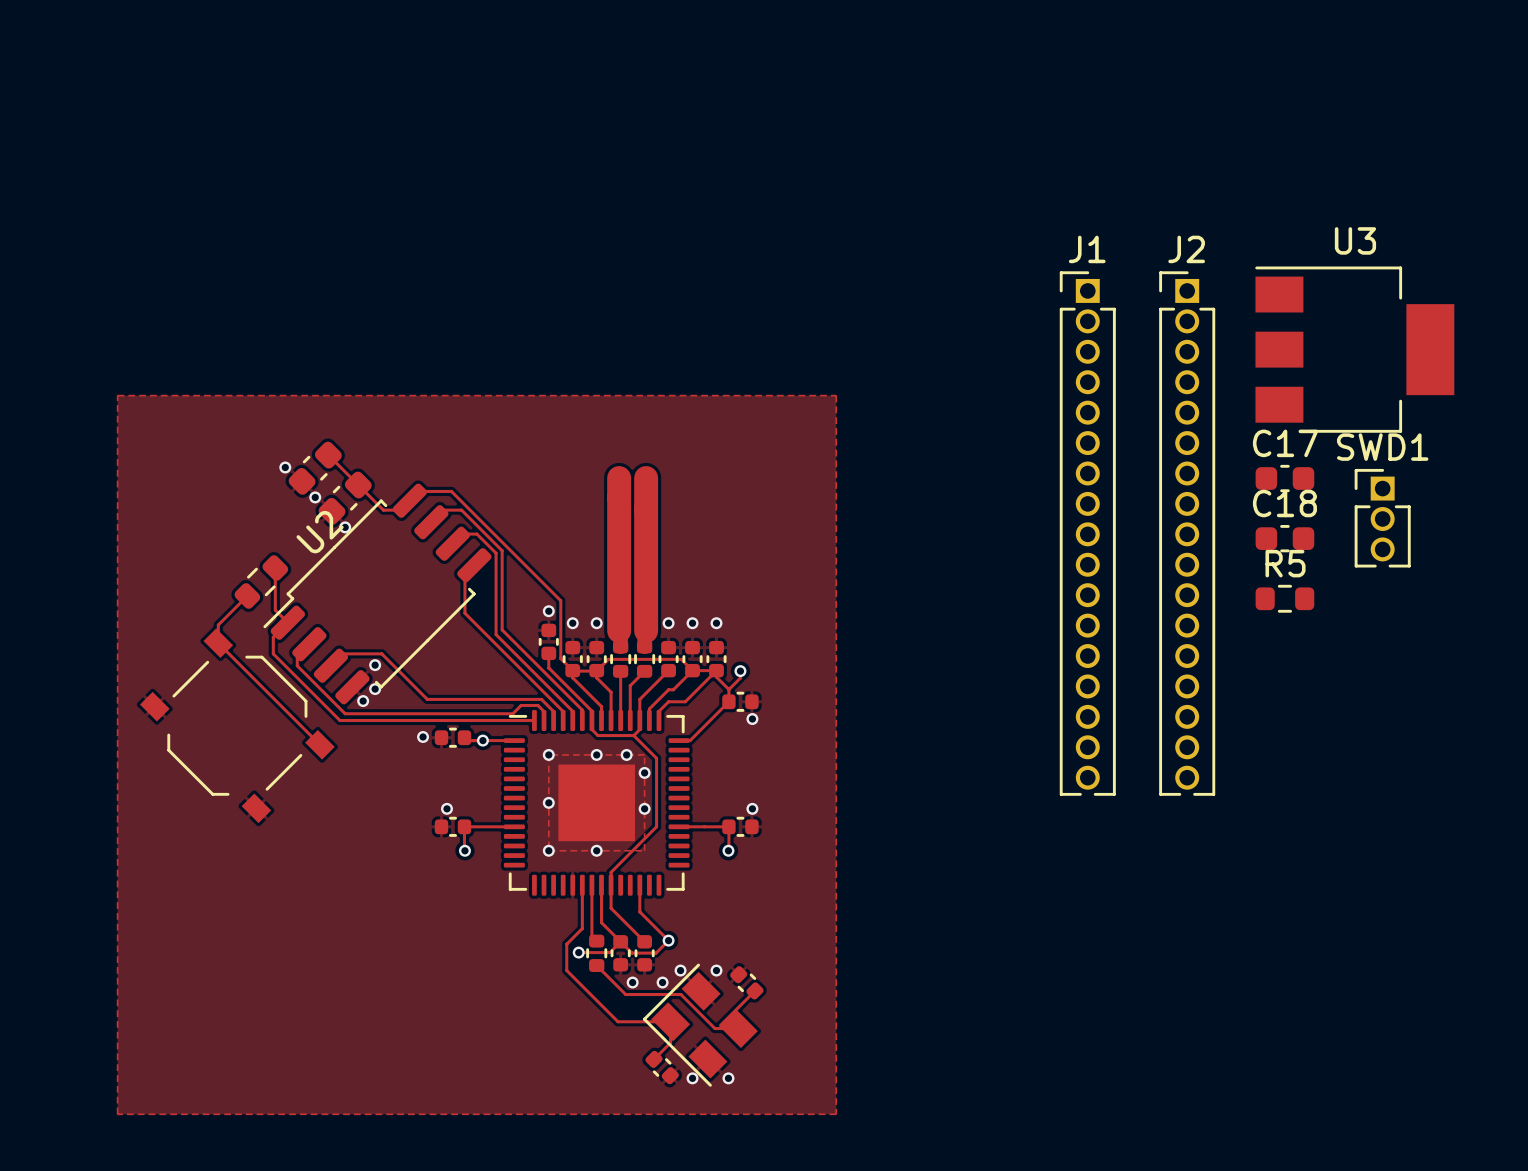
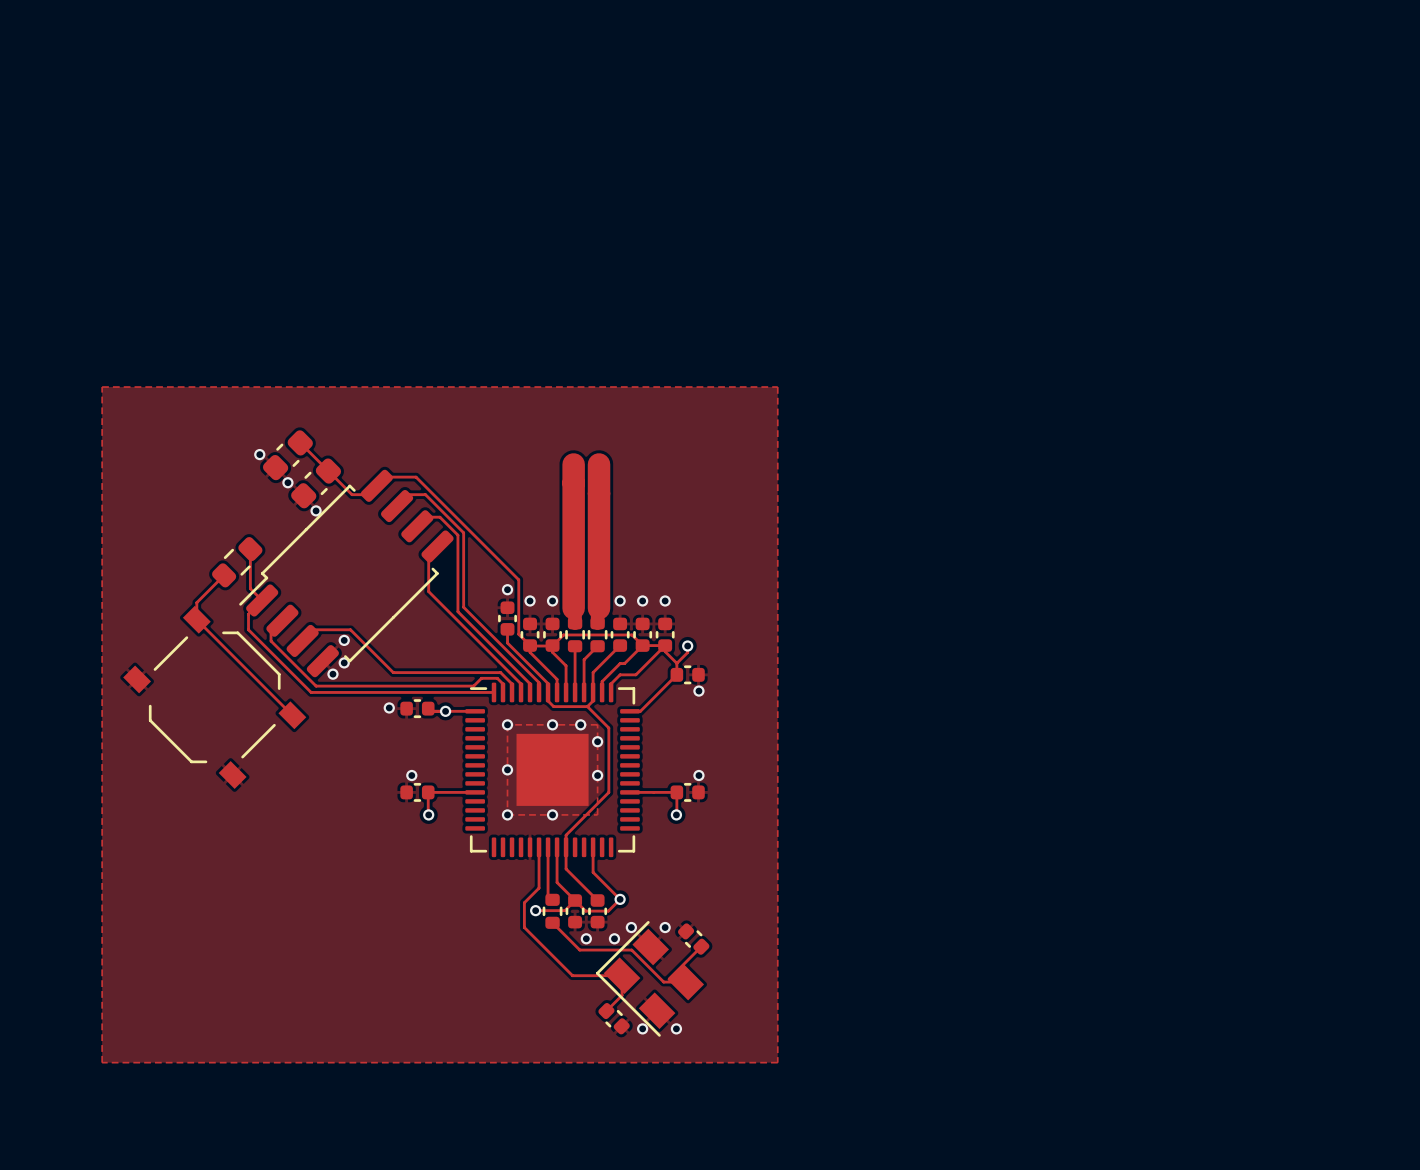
U3: (1354, 349) -> none
C17: (1284, 478) -> none
SWD1: (1382, 518) -> none
U2 name: U2 (320, 532) -> none
J1: (1087, 533) -> none
J2: (1187, 533) -> none
C18: (1284, 538) -> none
R5: (1284, 598) -> none

